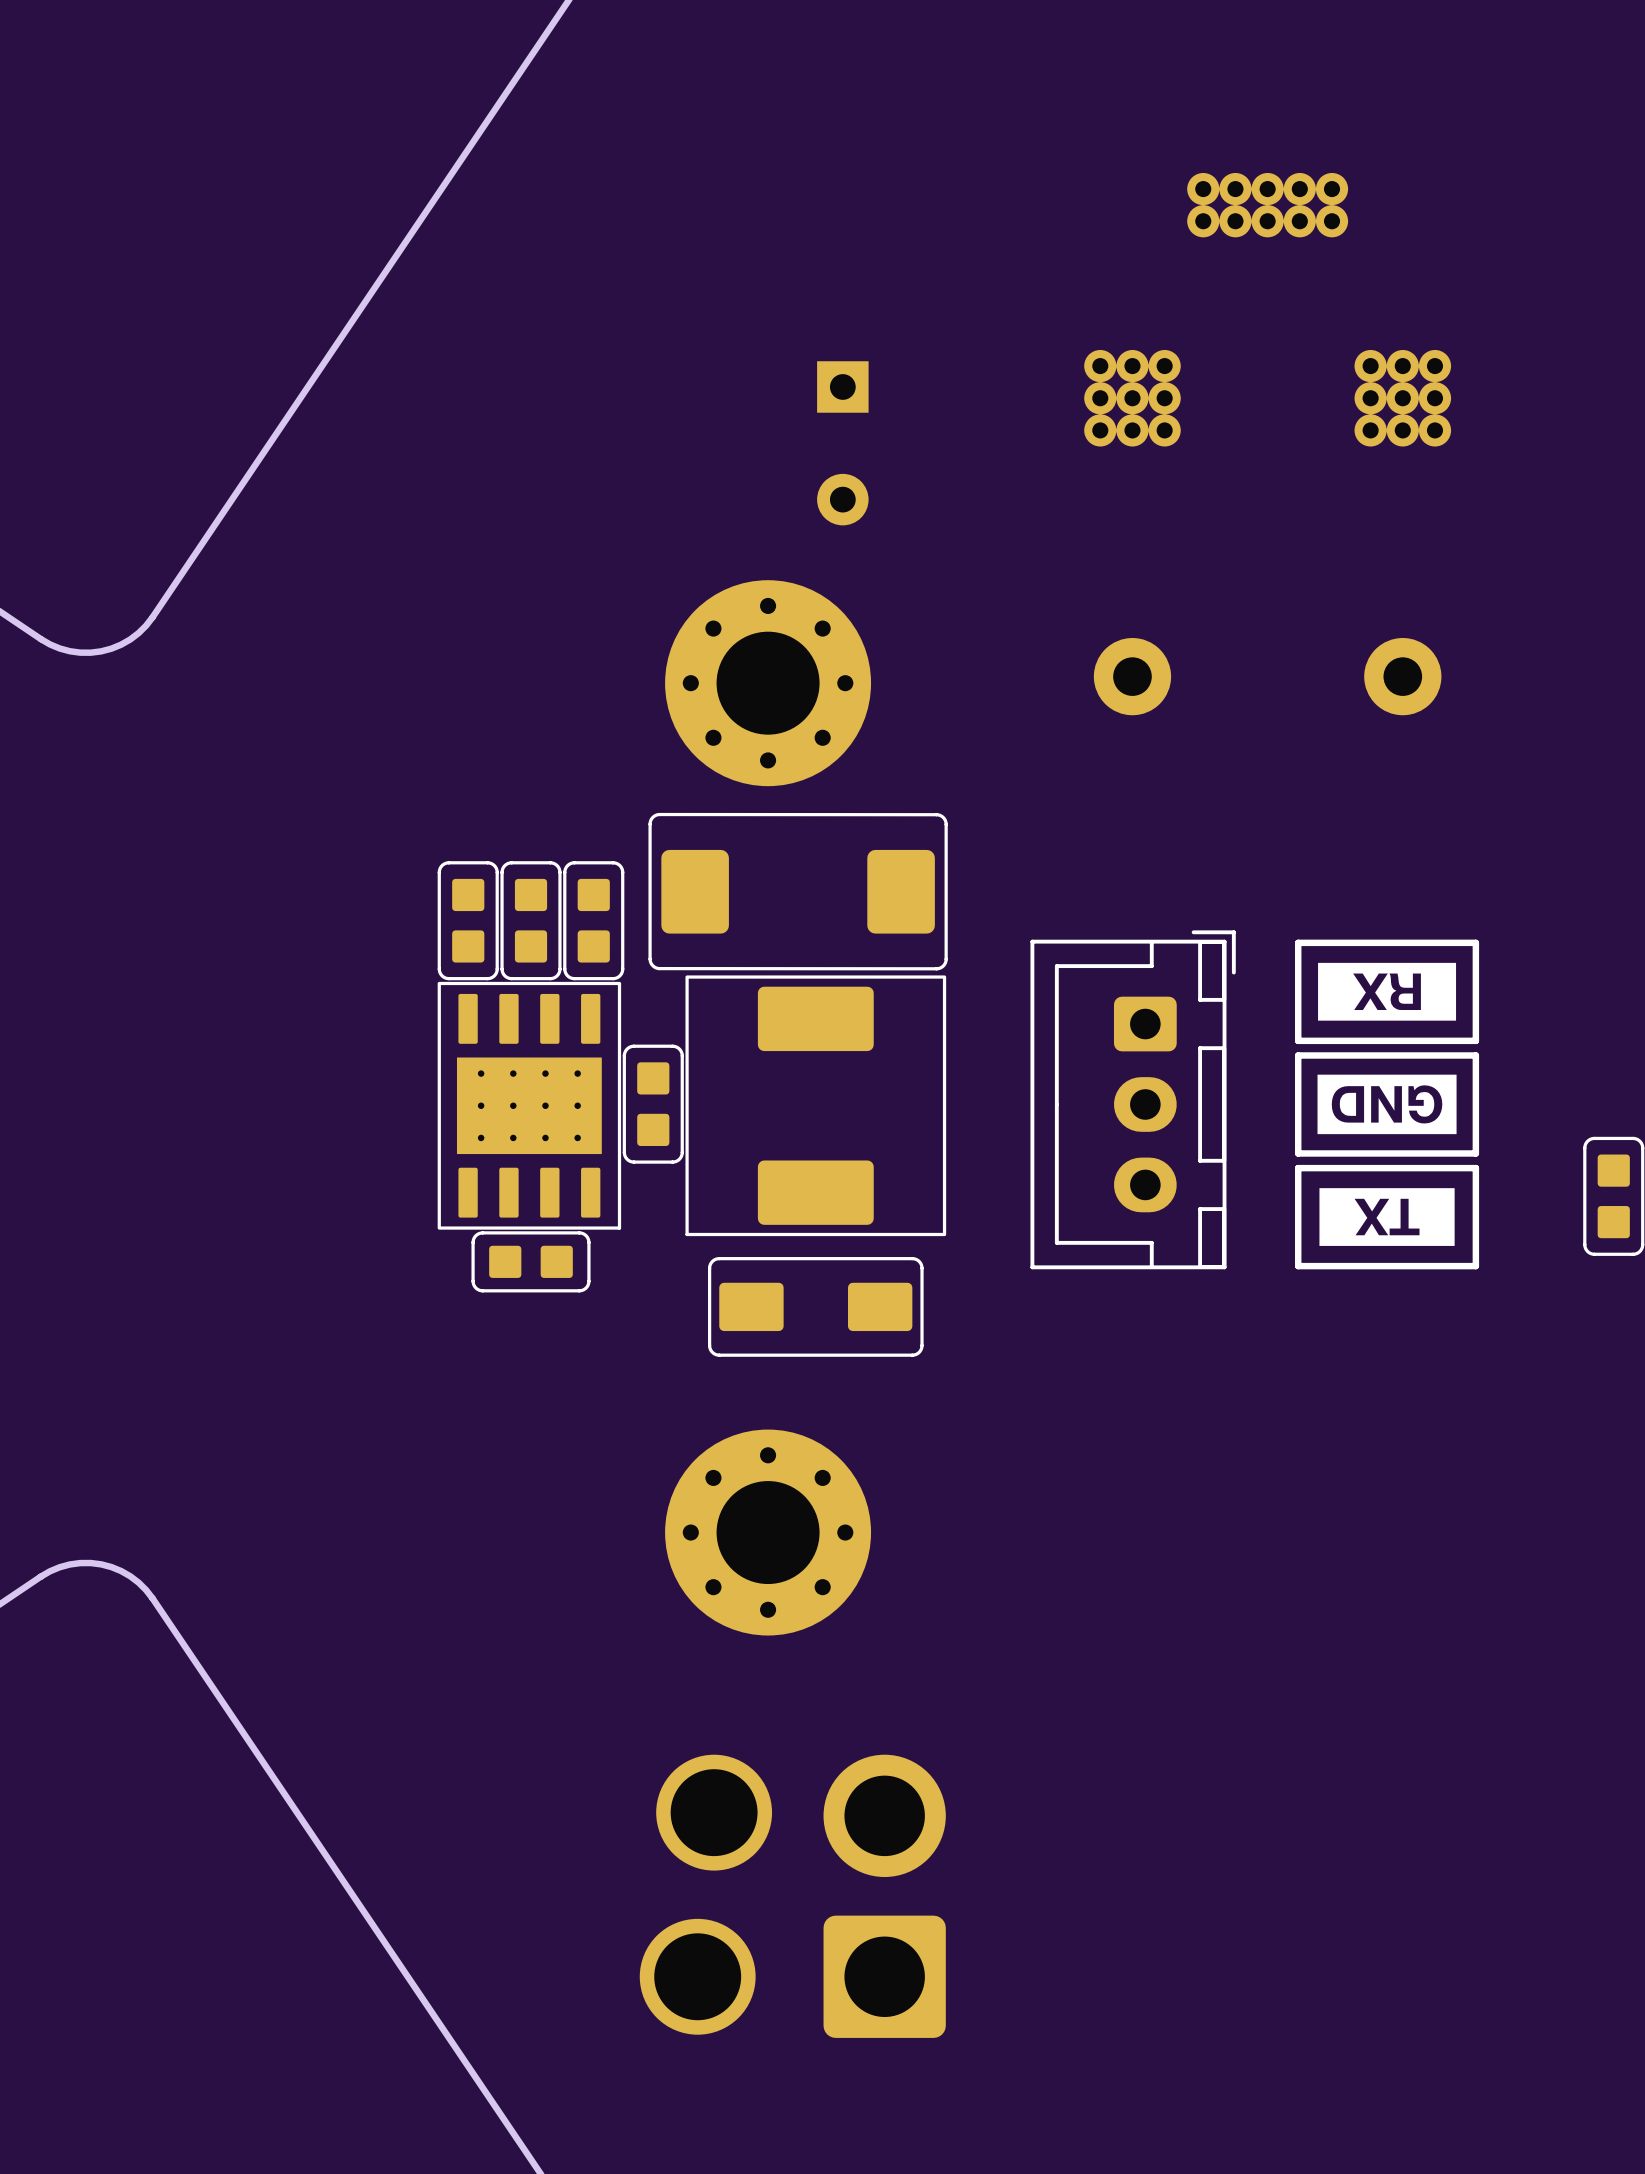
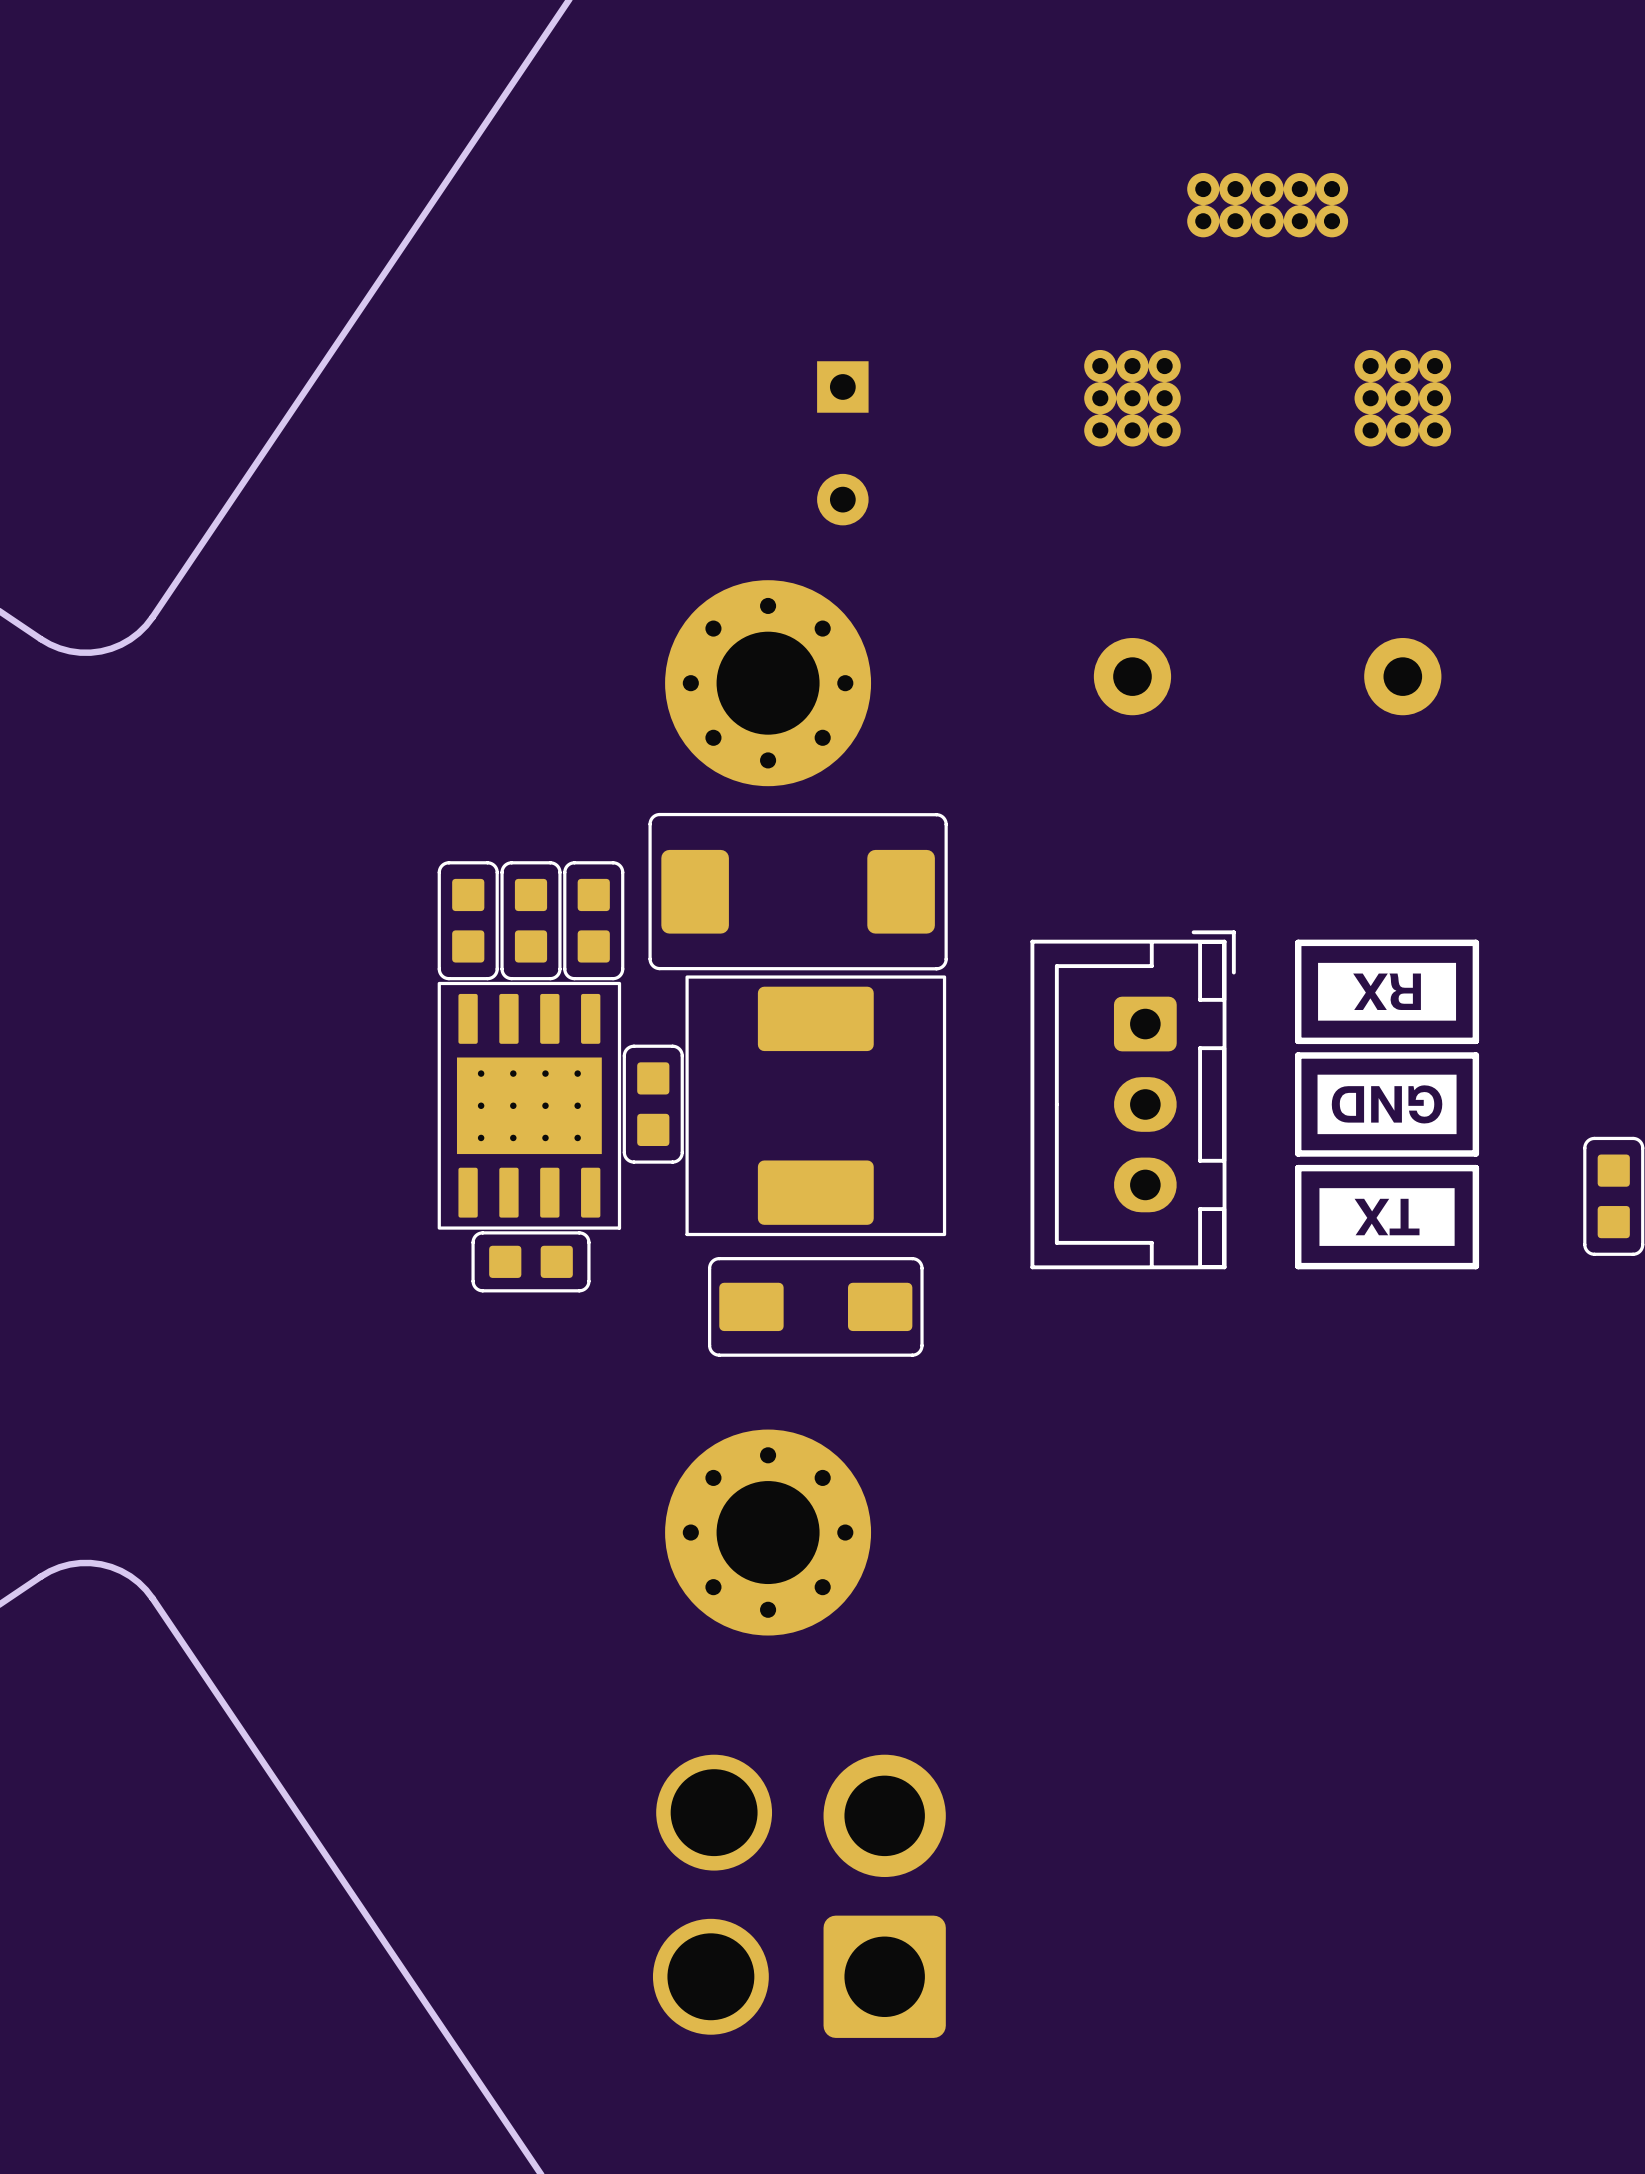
part position: (697, 1976) -> (710, 1976)

